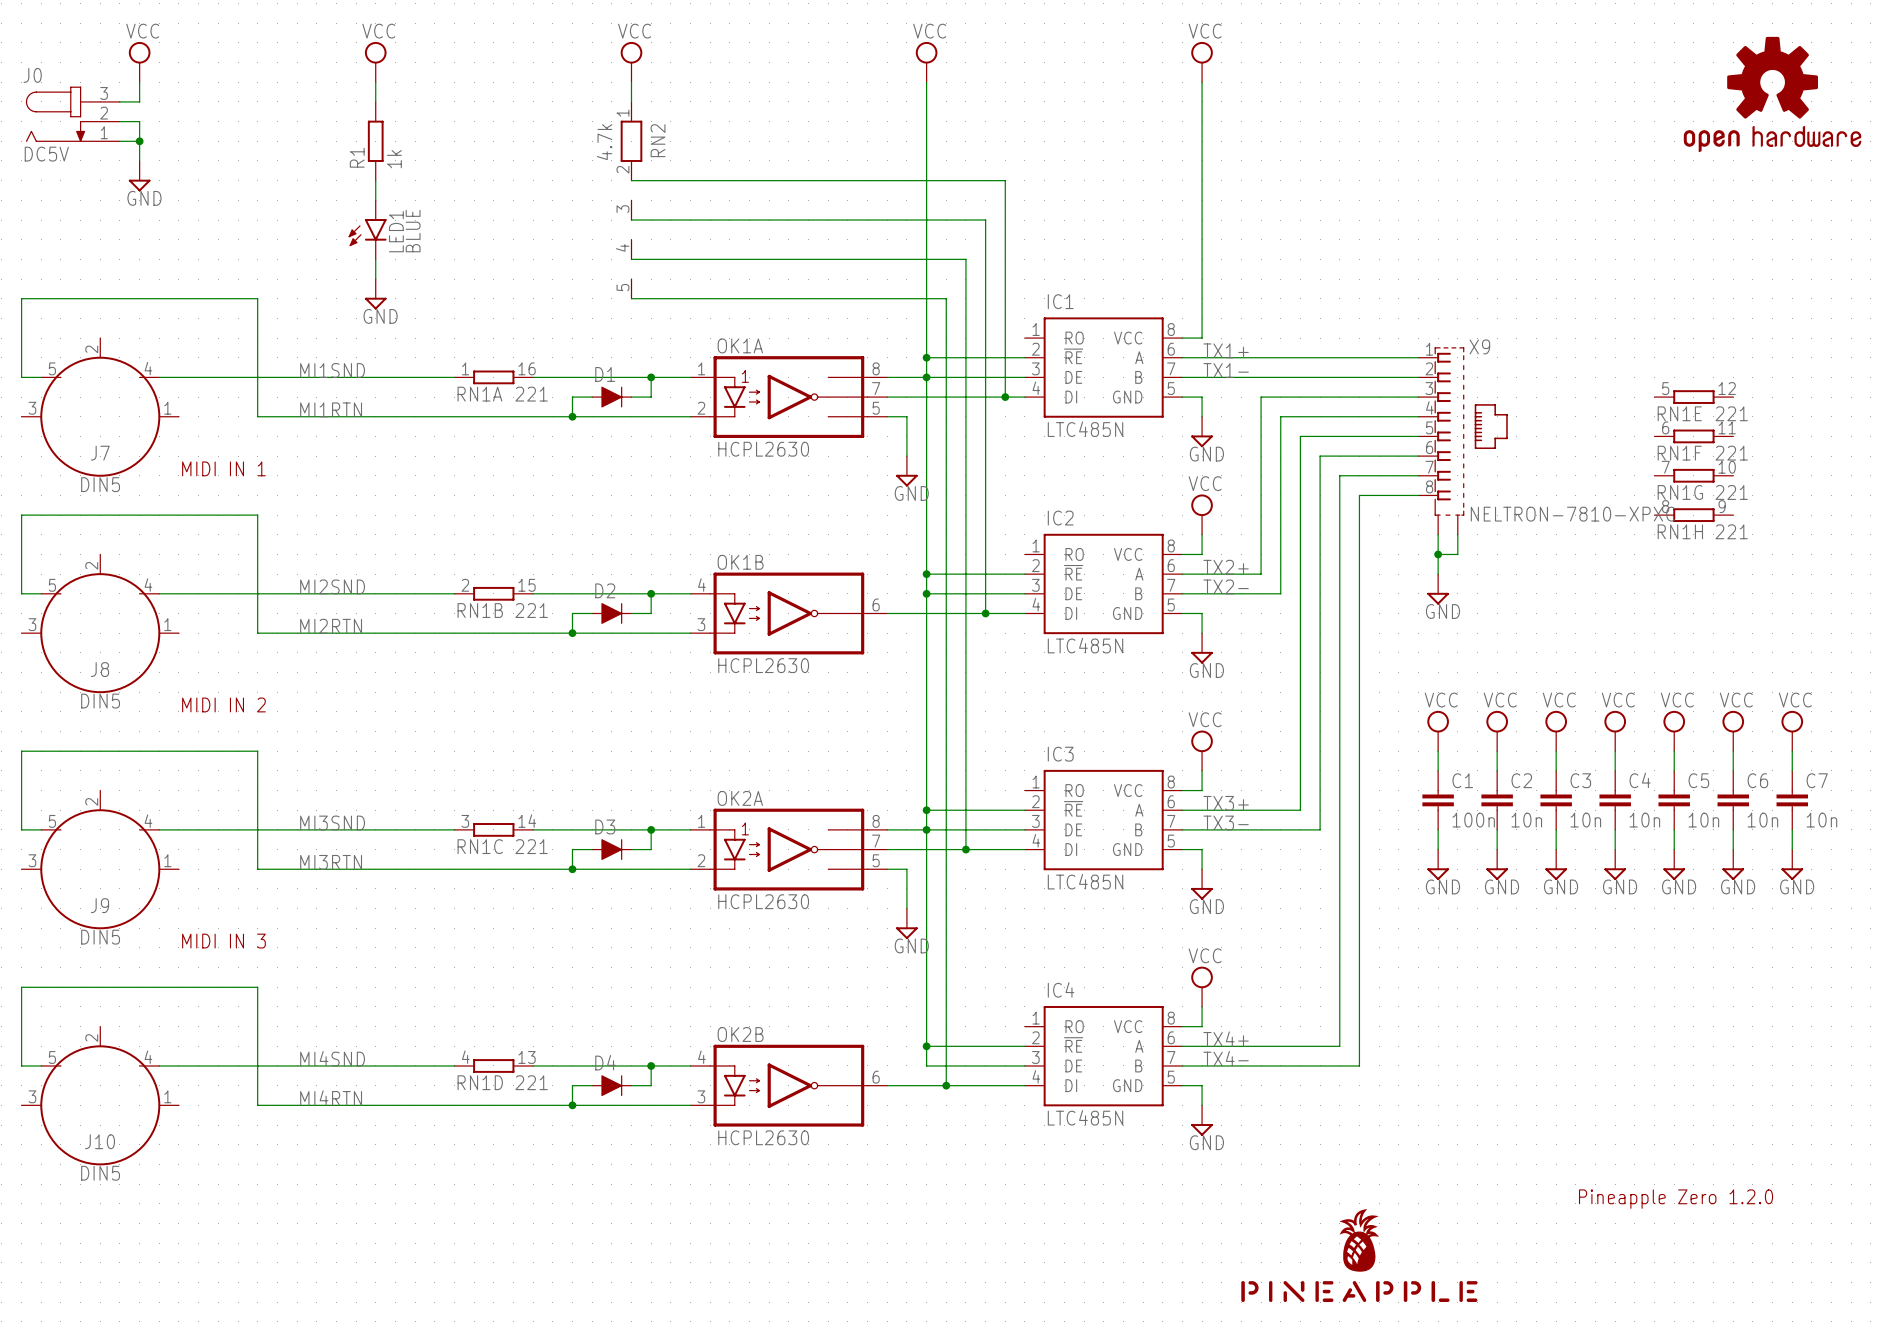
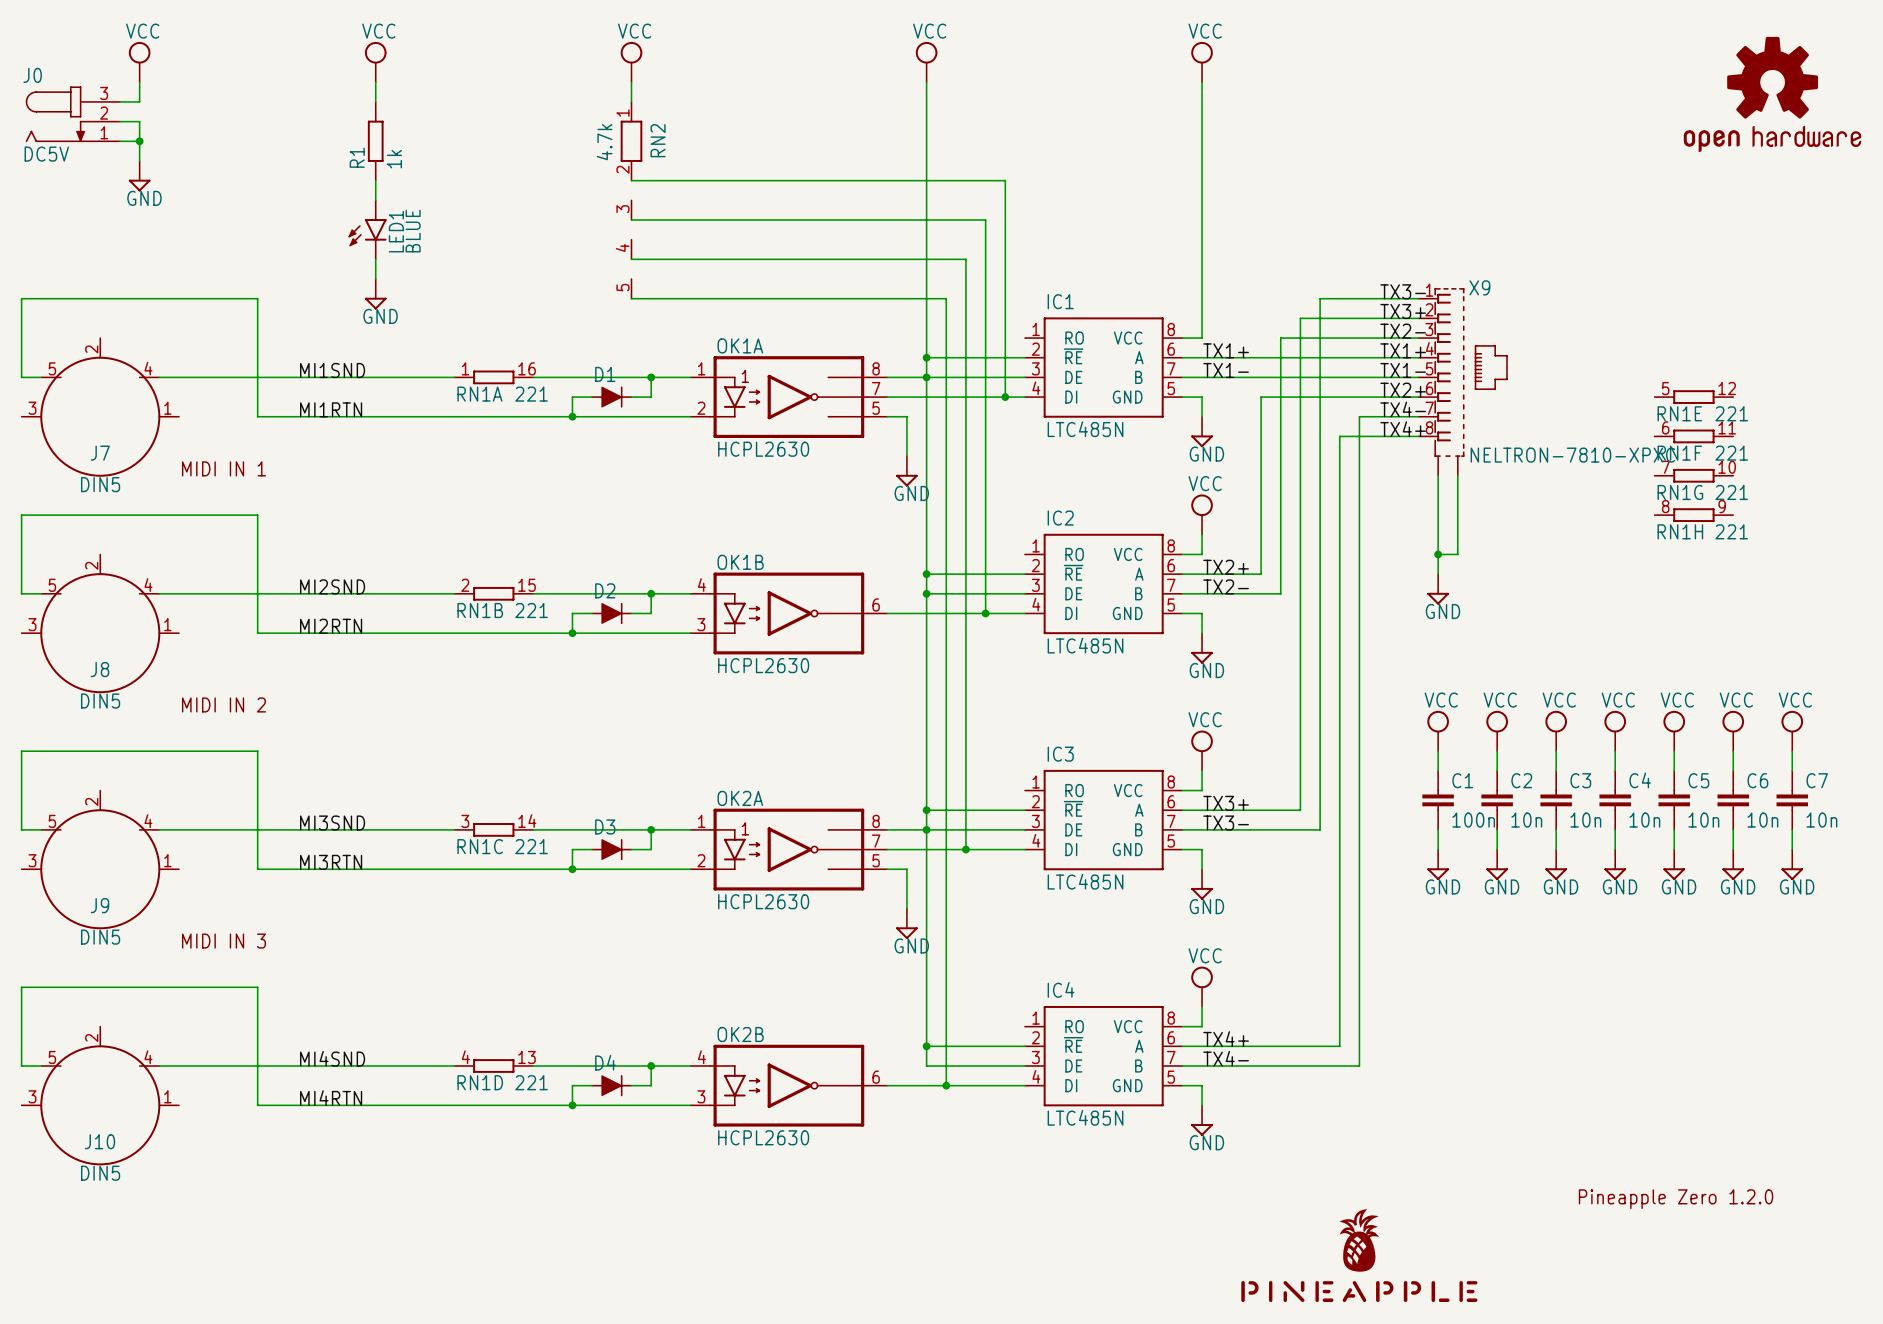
label: none -> TX3- (1403, 291)
label: none -> TX3+ (1403, 311)
wire: none -> (1418, 318) (1300, 318) (1300, 436)
label: none -> TX2- (1403, 331)
label: none -> TX1+ (1403, 350)
label: none -> TX1- (1403, 370)
label: none -> TX2+ (1403, 390)
label: none -> TX4- (1403, 409)
wire: (1280, 416) (1359, 416) -> (1280, 416) (1280, 338) (1418, 338)
label: none -> TX4+ (1403, 429)
wire: (1300, 436) (1339, 436) -> (1339, 475) (1339, 436)
X9 position: (1463, 441) -> (1463, 382)
wire: (1320, 456) (1418, 456) -> (1320, 456) (1320, 298) (1418, 298)
wire: (1339, 475) (1418, 475) -> none
wire: none -> (1457, 475) (1457, 534)
wire: (1359, 495) (1418, 495) -> (1359, 495) (1359, 416)

